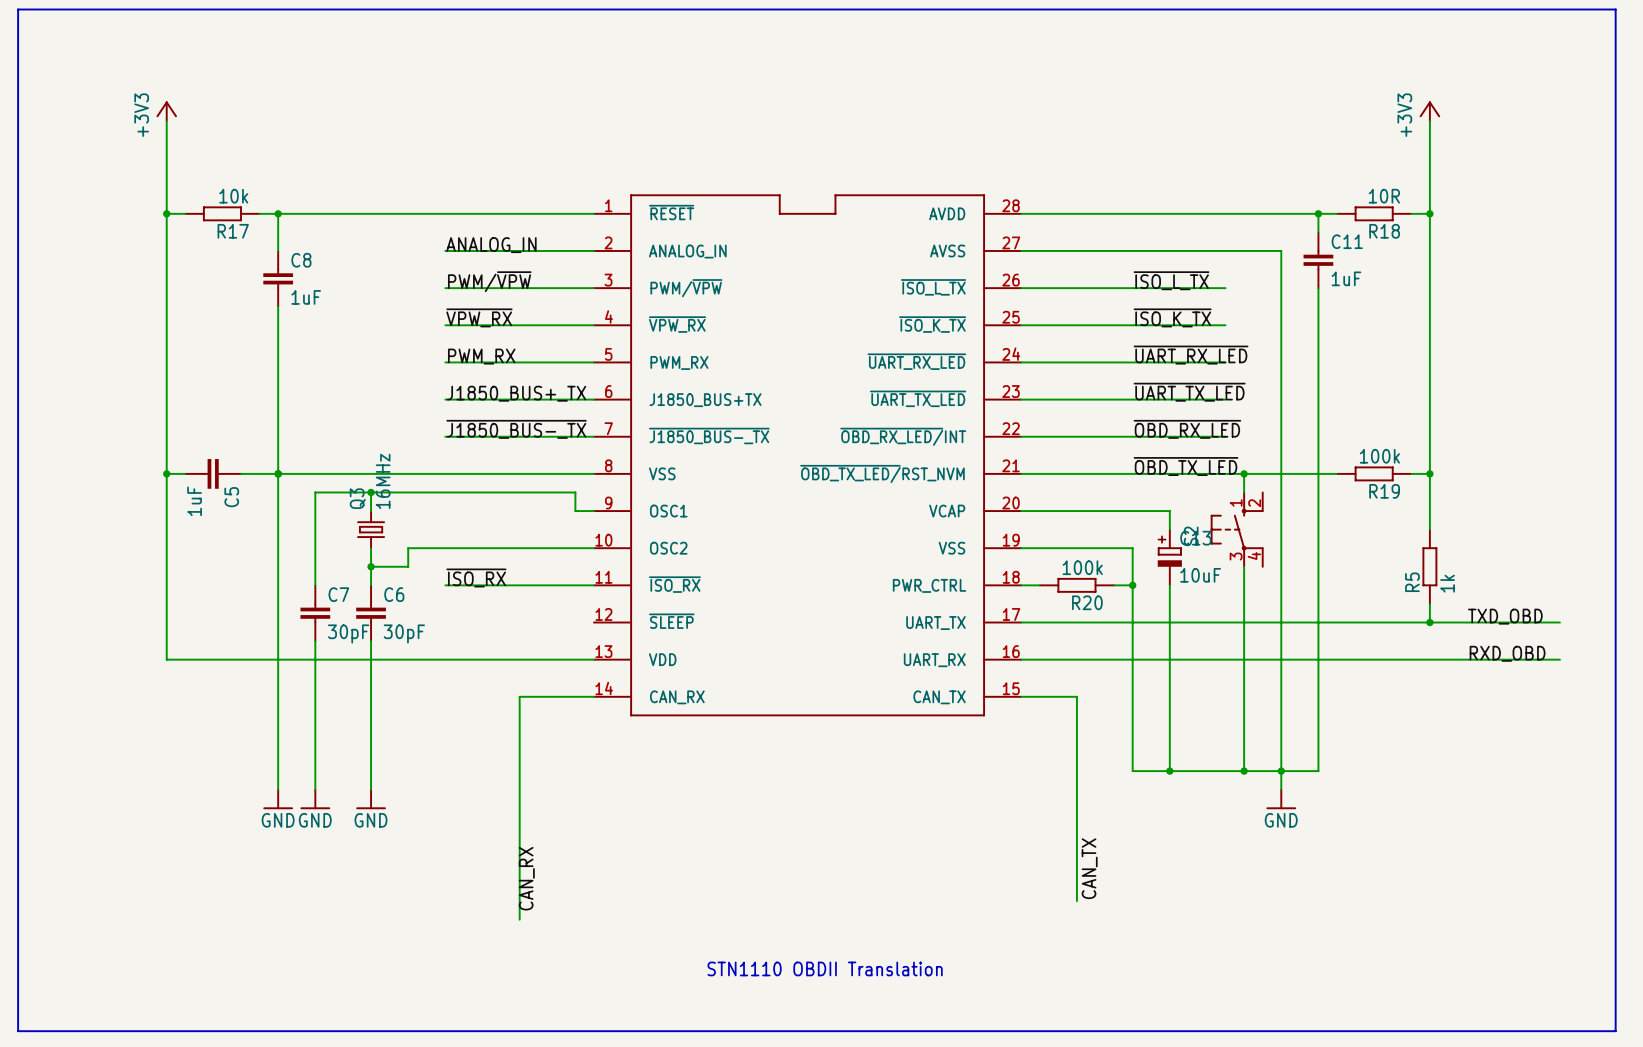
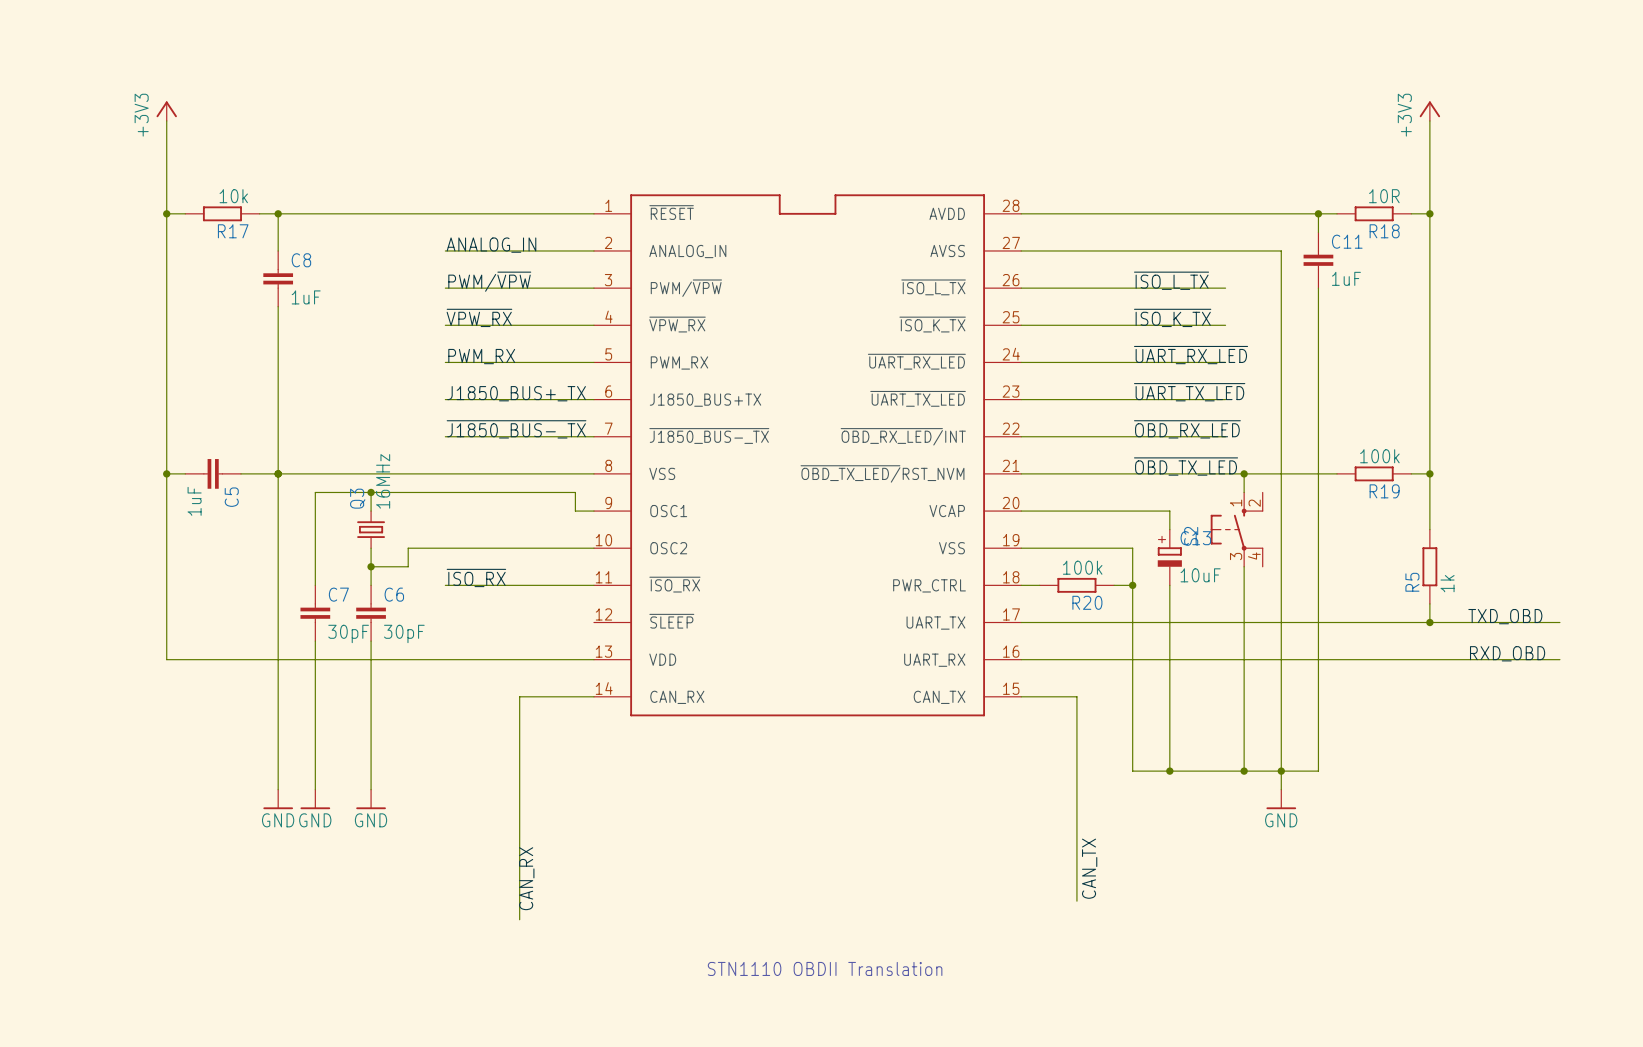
line: (18, 9) (1615, 9) (1615, 1031) (18, 1031) (18, 9) -> none

